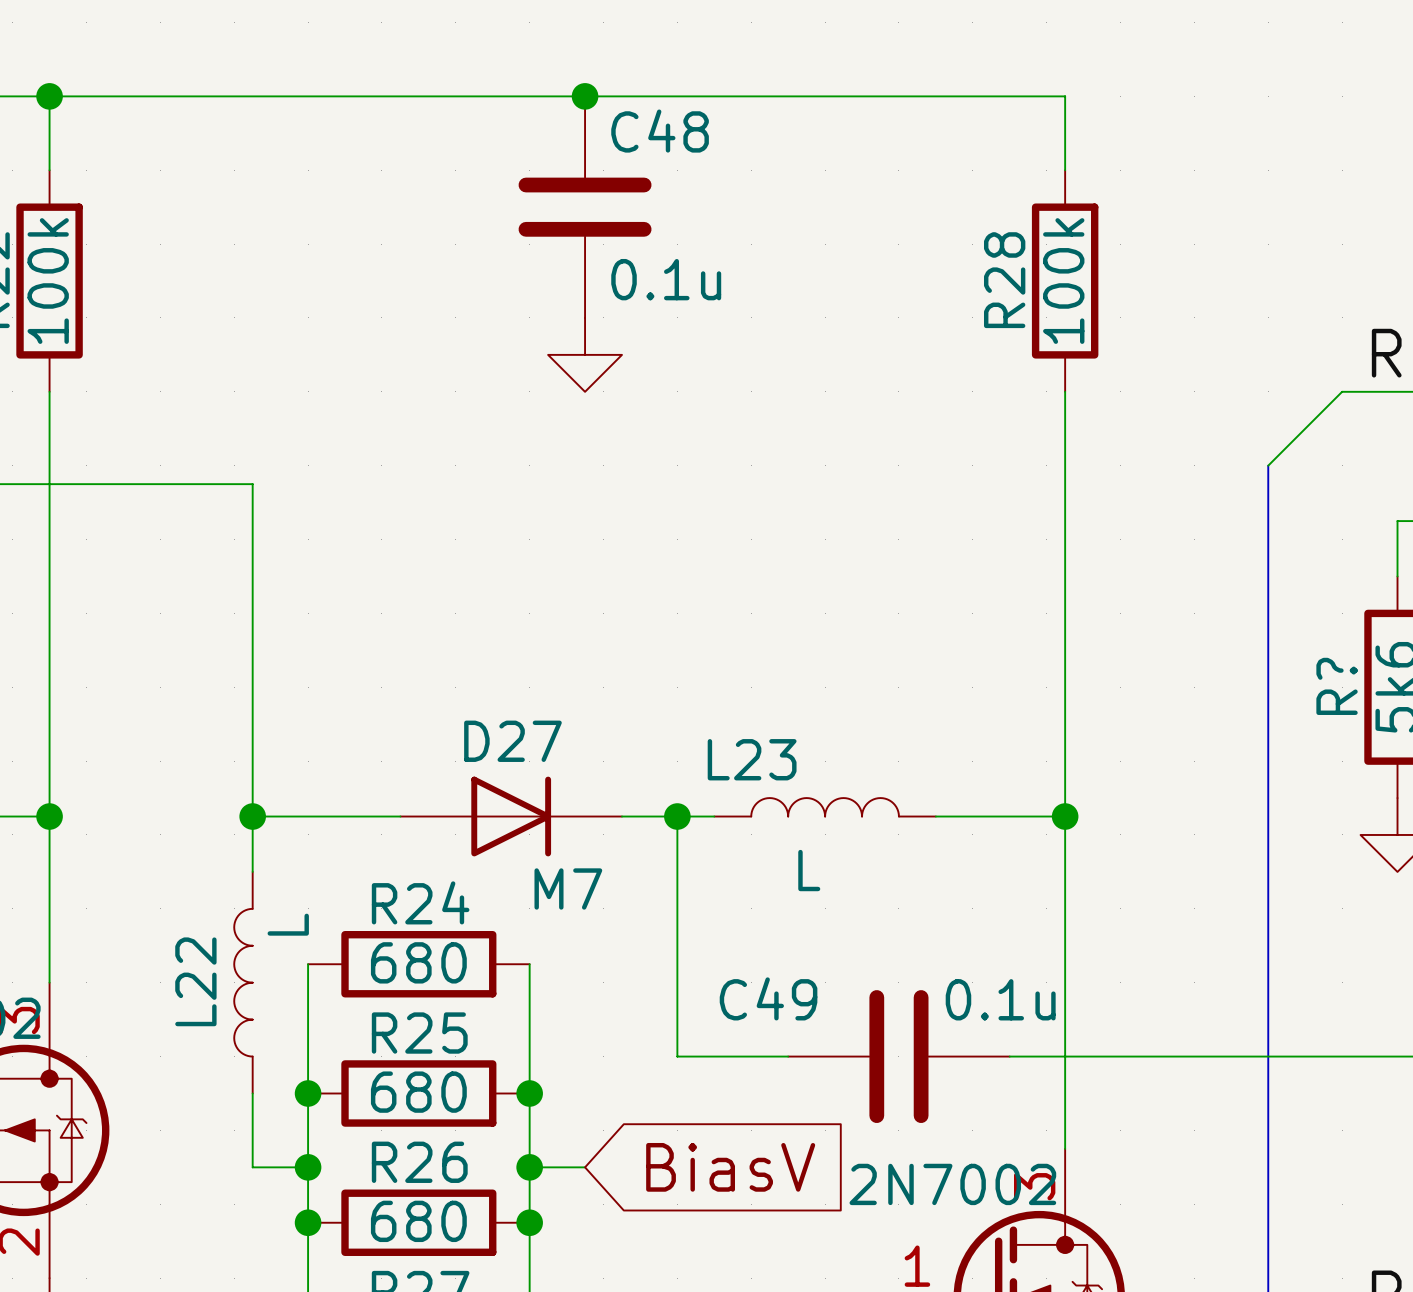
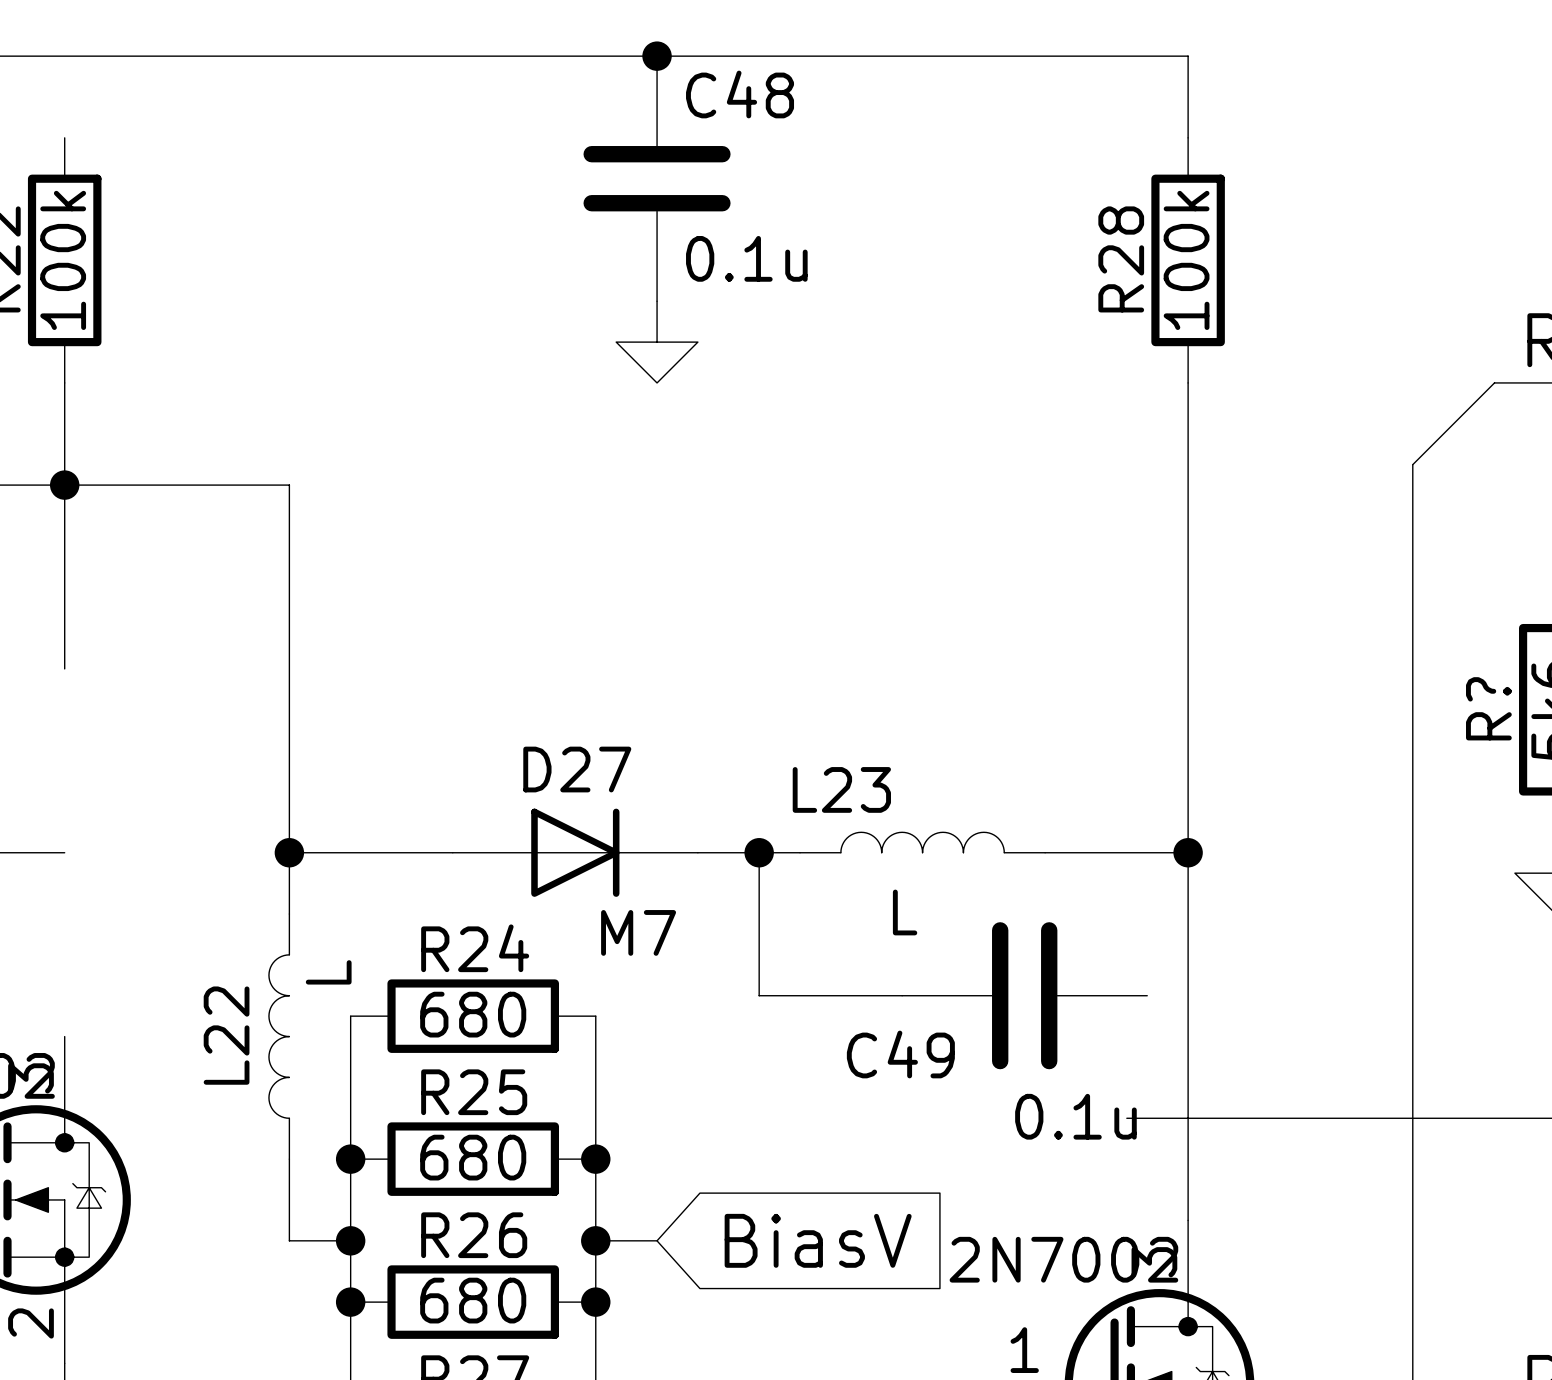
wire: (49, 96) (49, 170) -> none
junction: (49, 96) -> none
junction: none -> (64, 485)
wire: (49, 650) (49, 982) -> none
junction: (49, 816) -> none
wire: (677, 945) (677, 1056) (788, 1056) -> (759, 995) (902, 995)
C49 name position: C49 (768, 998) -> C49 (900, 1054)
C49 value position: 0.1u (1000, 999) -> 0.1u (1075, 1116)
C49 position: (898, 1056) -> (1024, 995)

